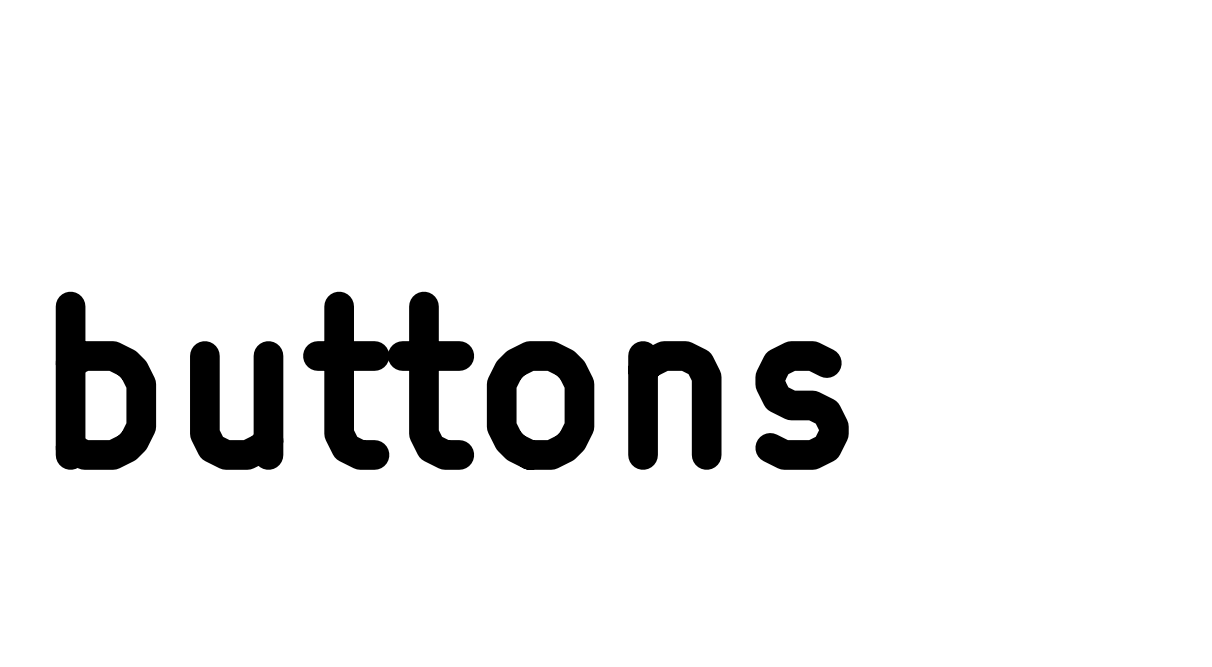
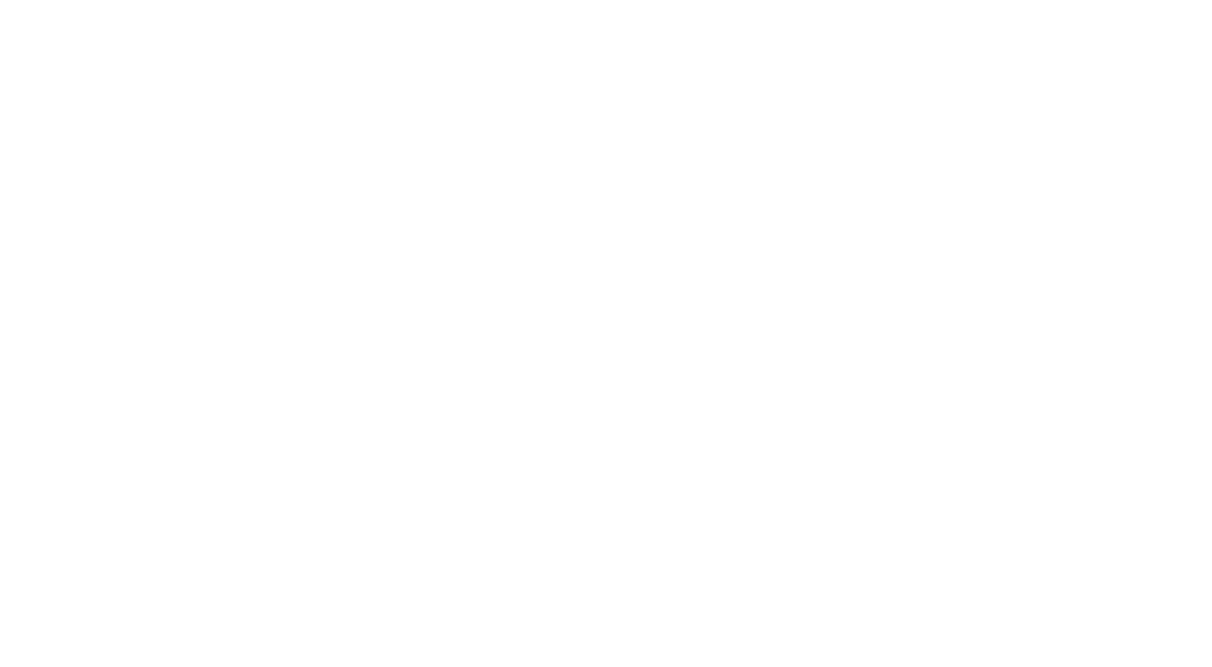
text: buttons (452, 380) -> none

